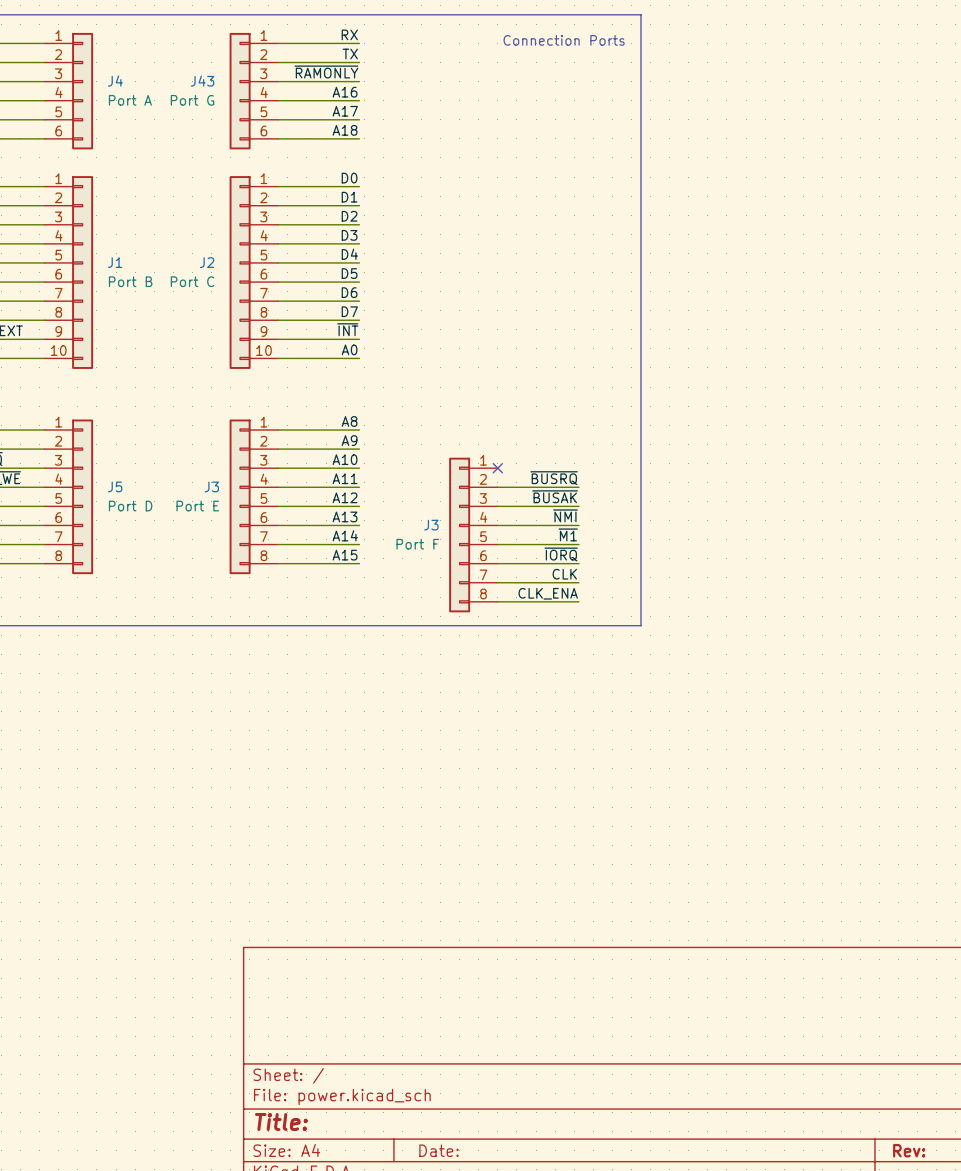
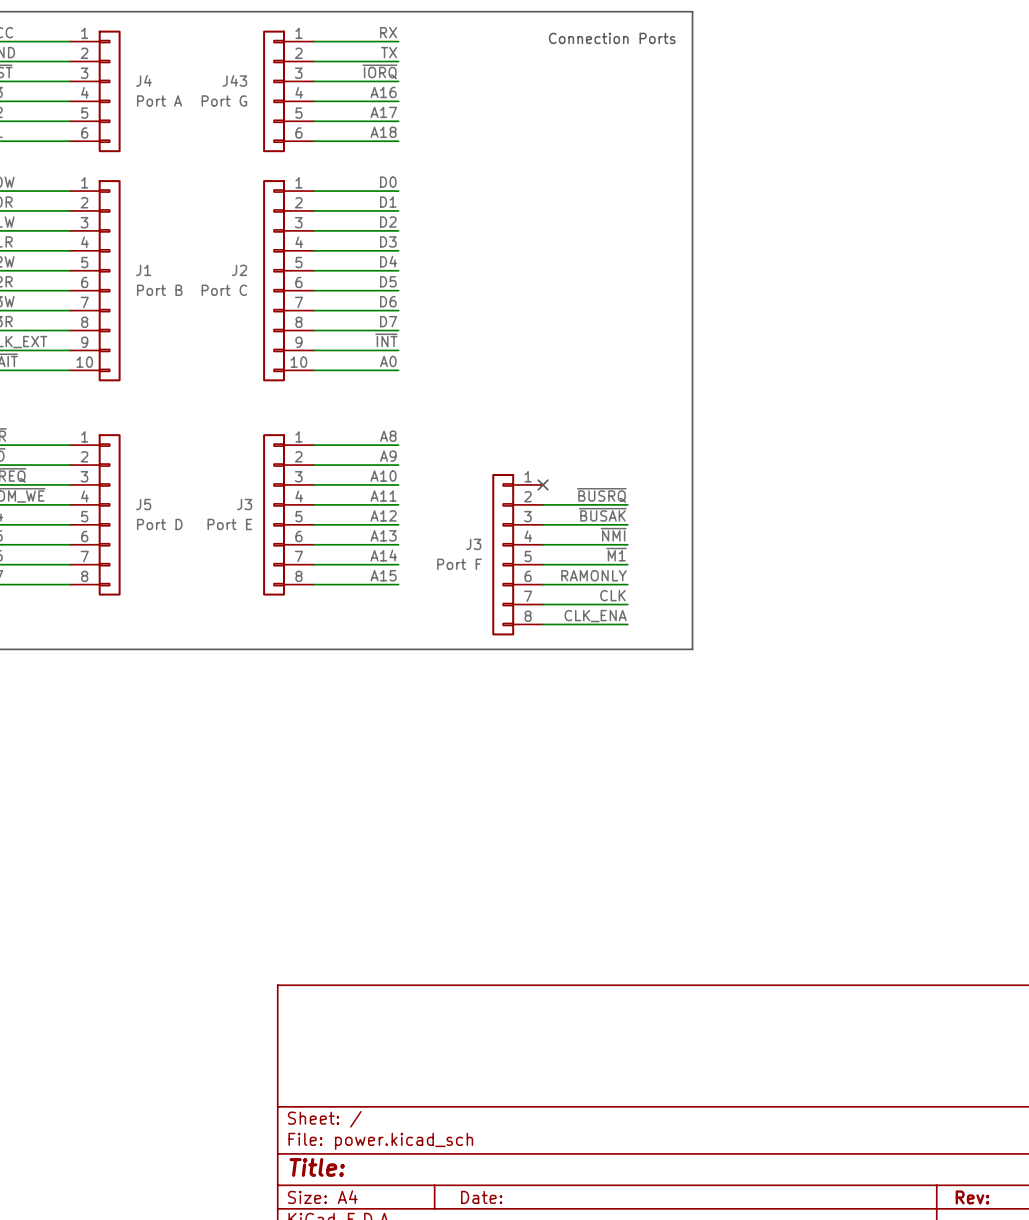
label: ~{RAMONLY} (326, 71) -> ~{IORQ} (380, 71)
label: ~{IORQ} (561, 554) -> RAMONLY (594, 575)

